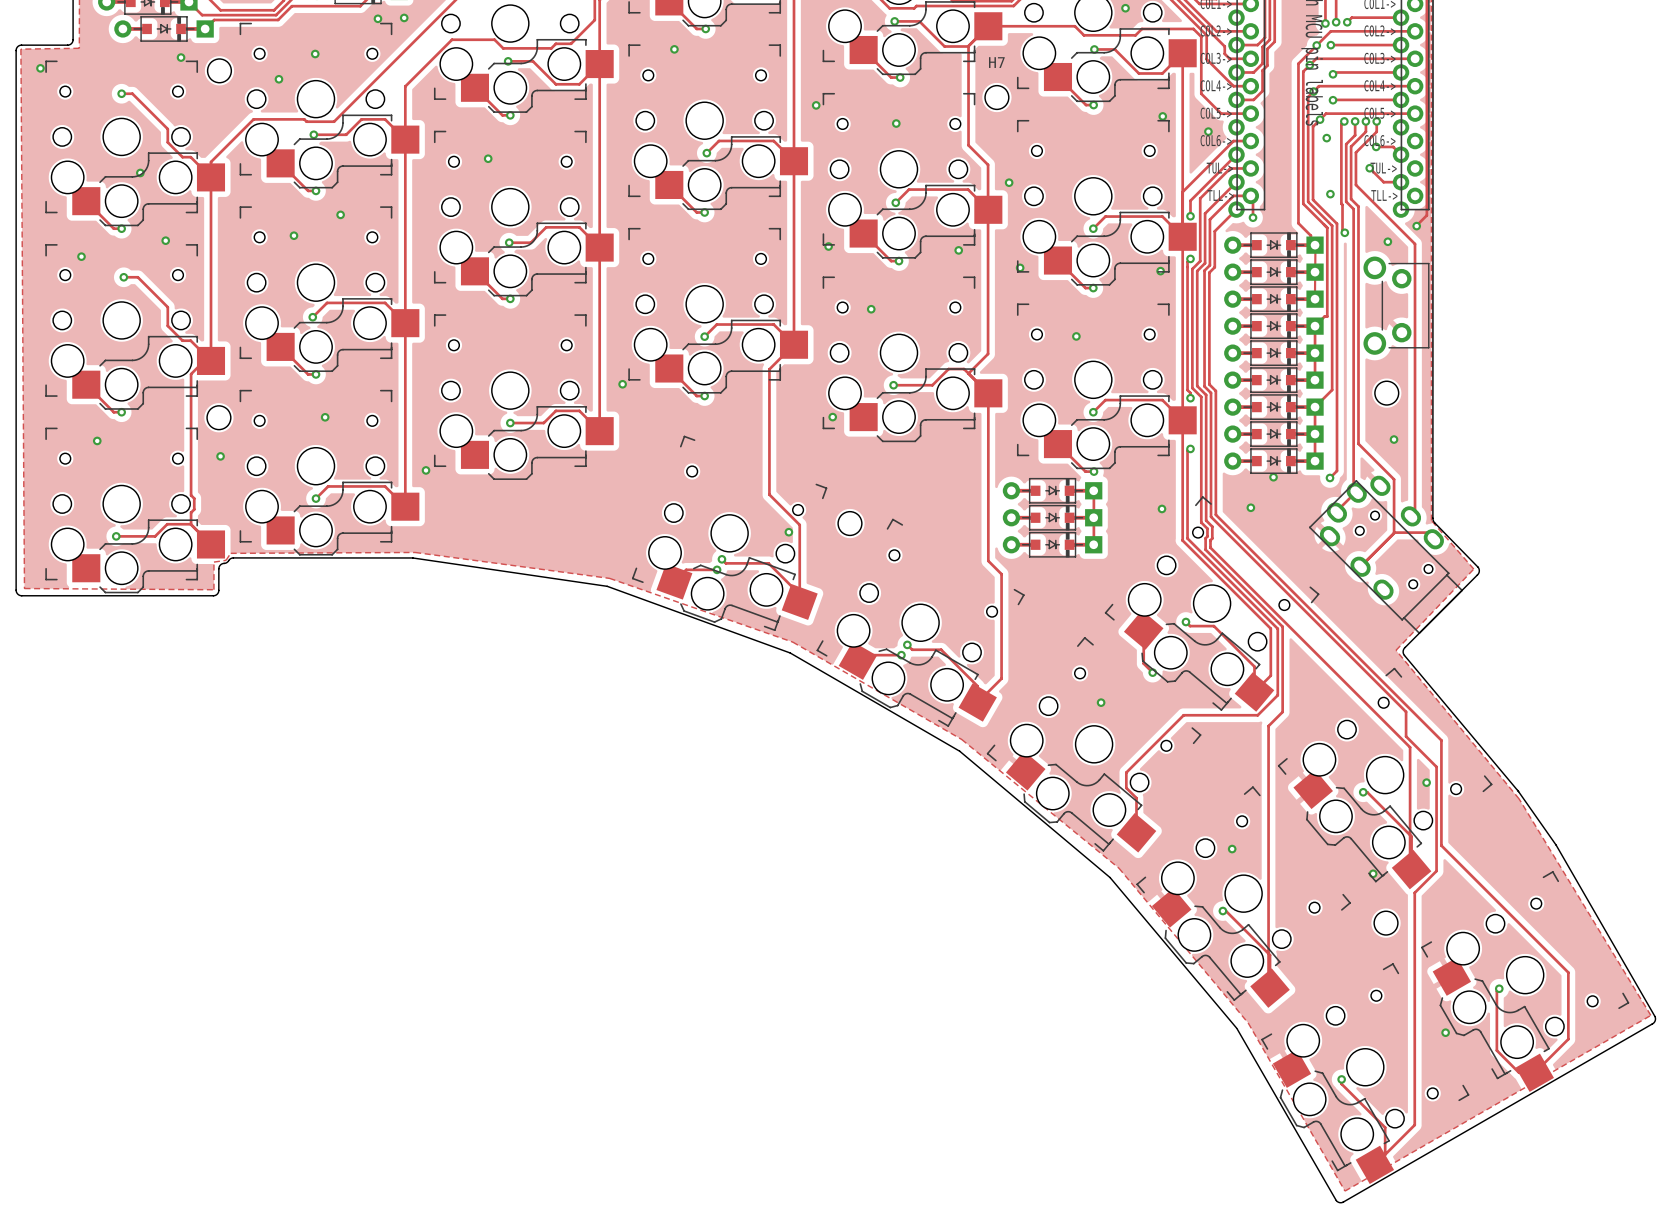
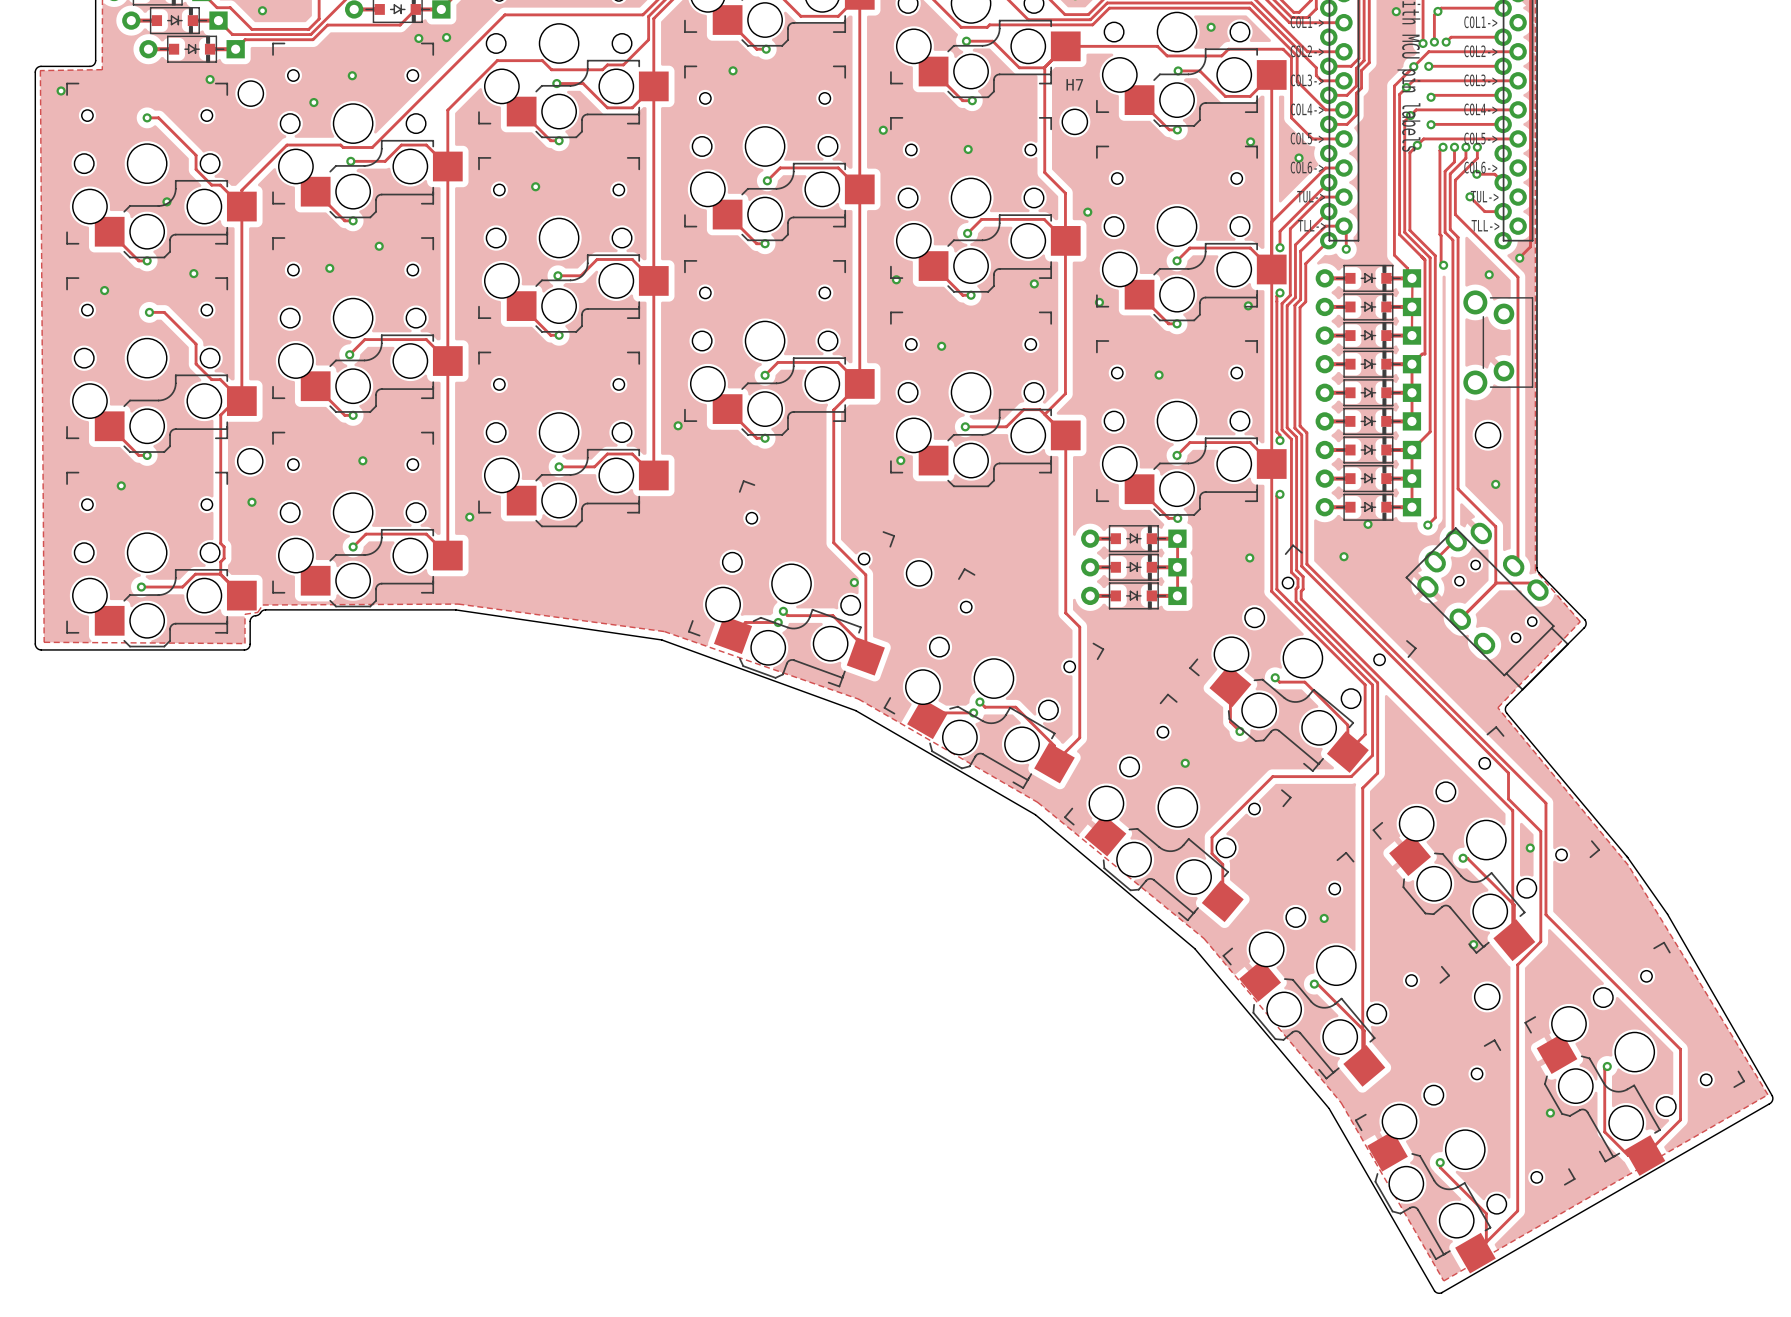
via: (1326, 138) -> none
via: (1330, 194) -> none

